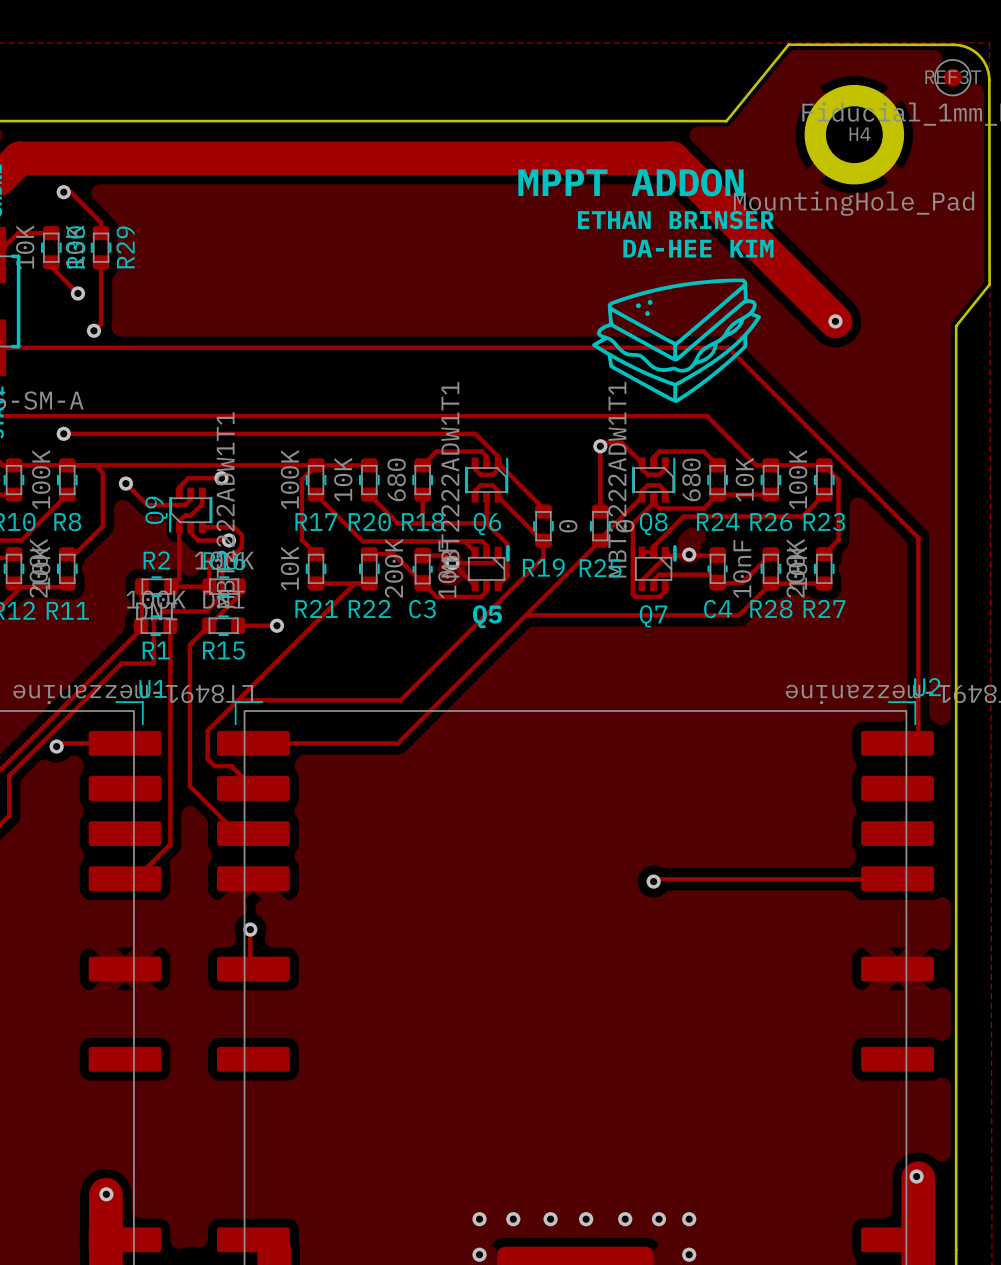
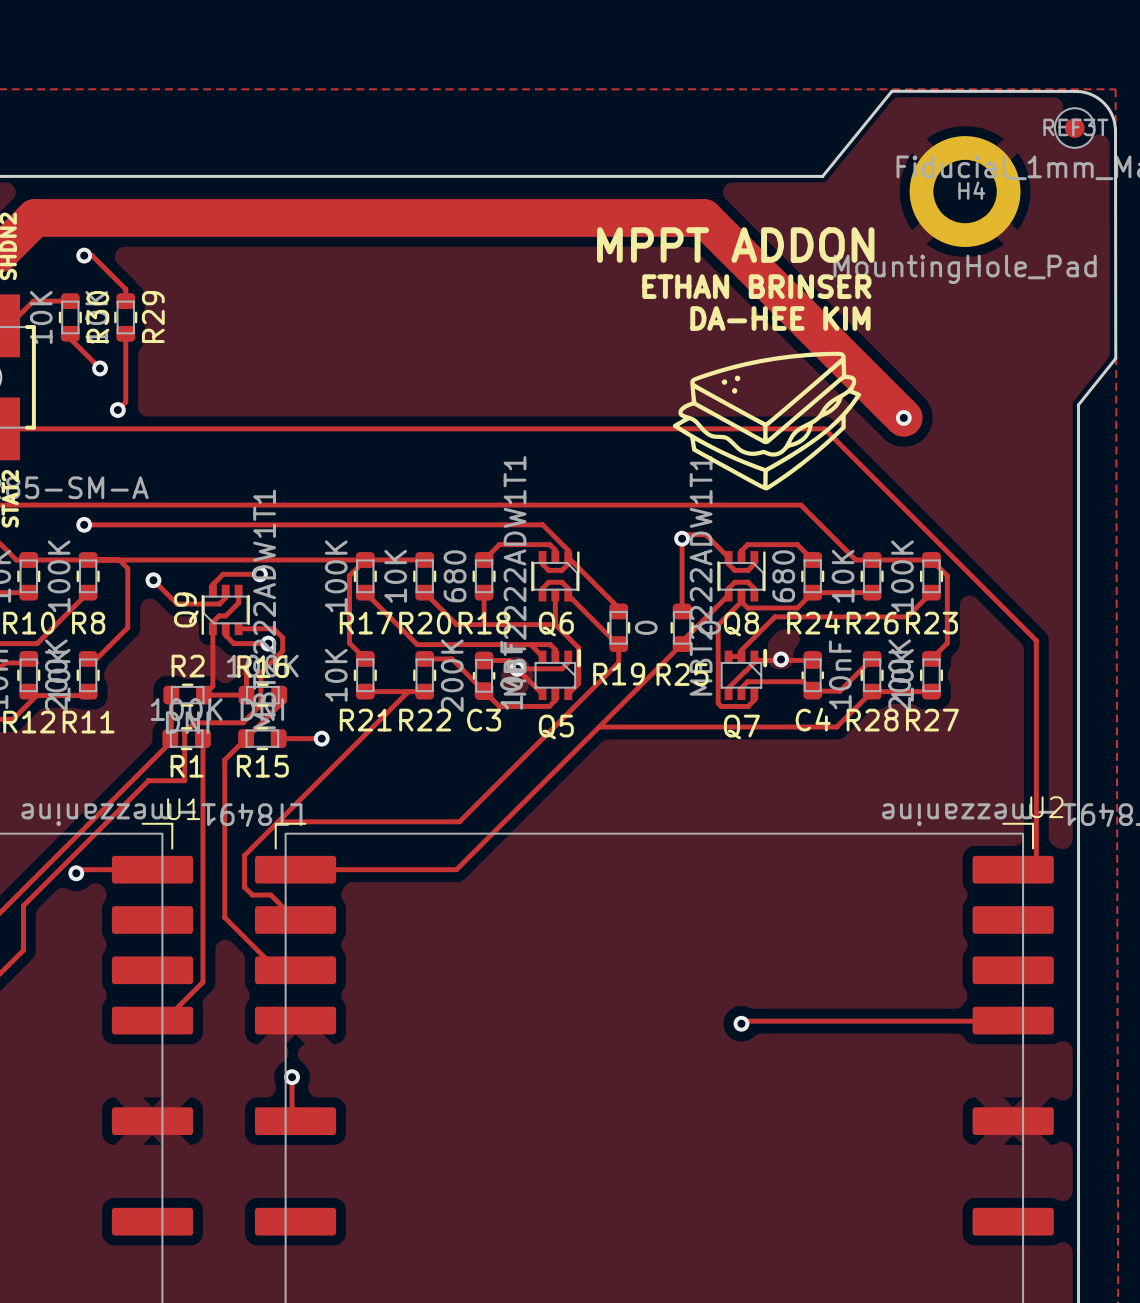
track: (619, 158) (672, 158) (835, 321) -> (703, 217) (903, 417)
via position: (835, 321) -> (903, 417)

